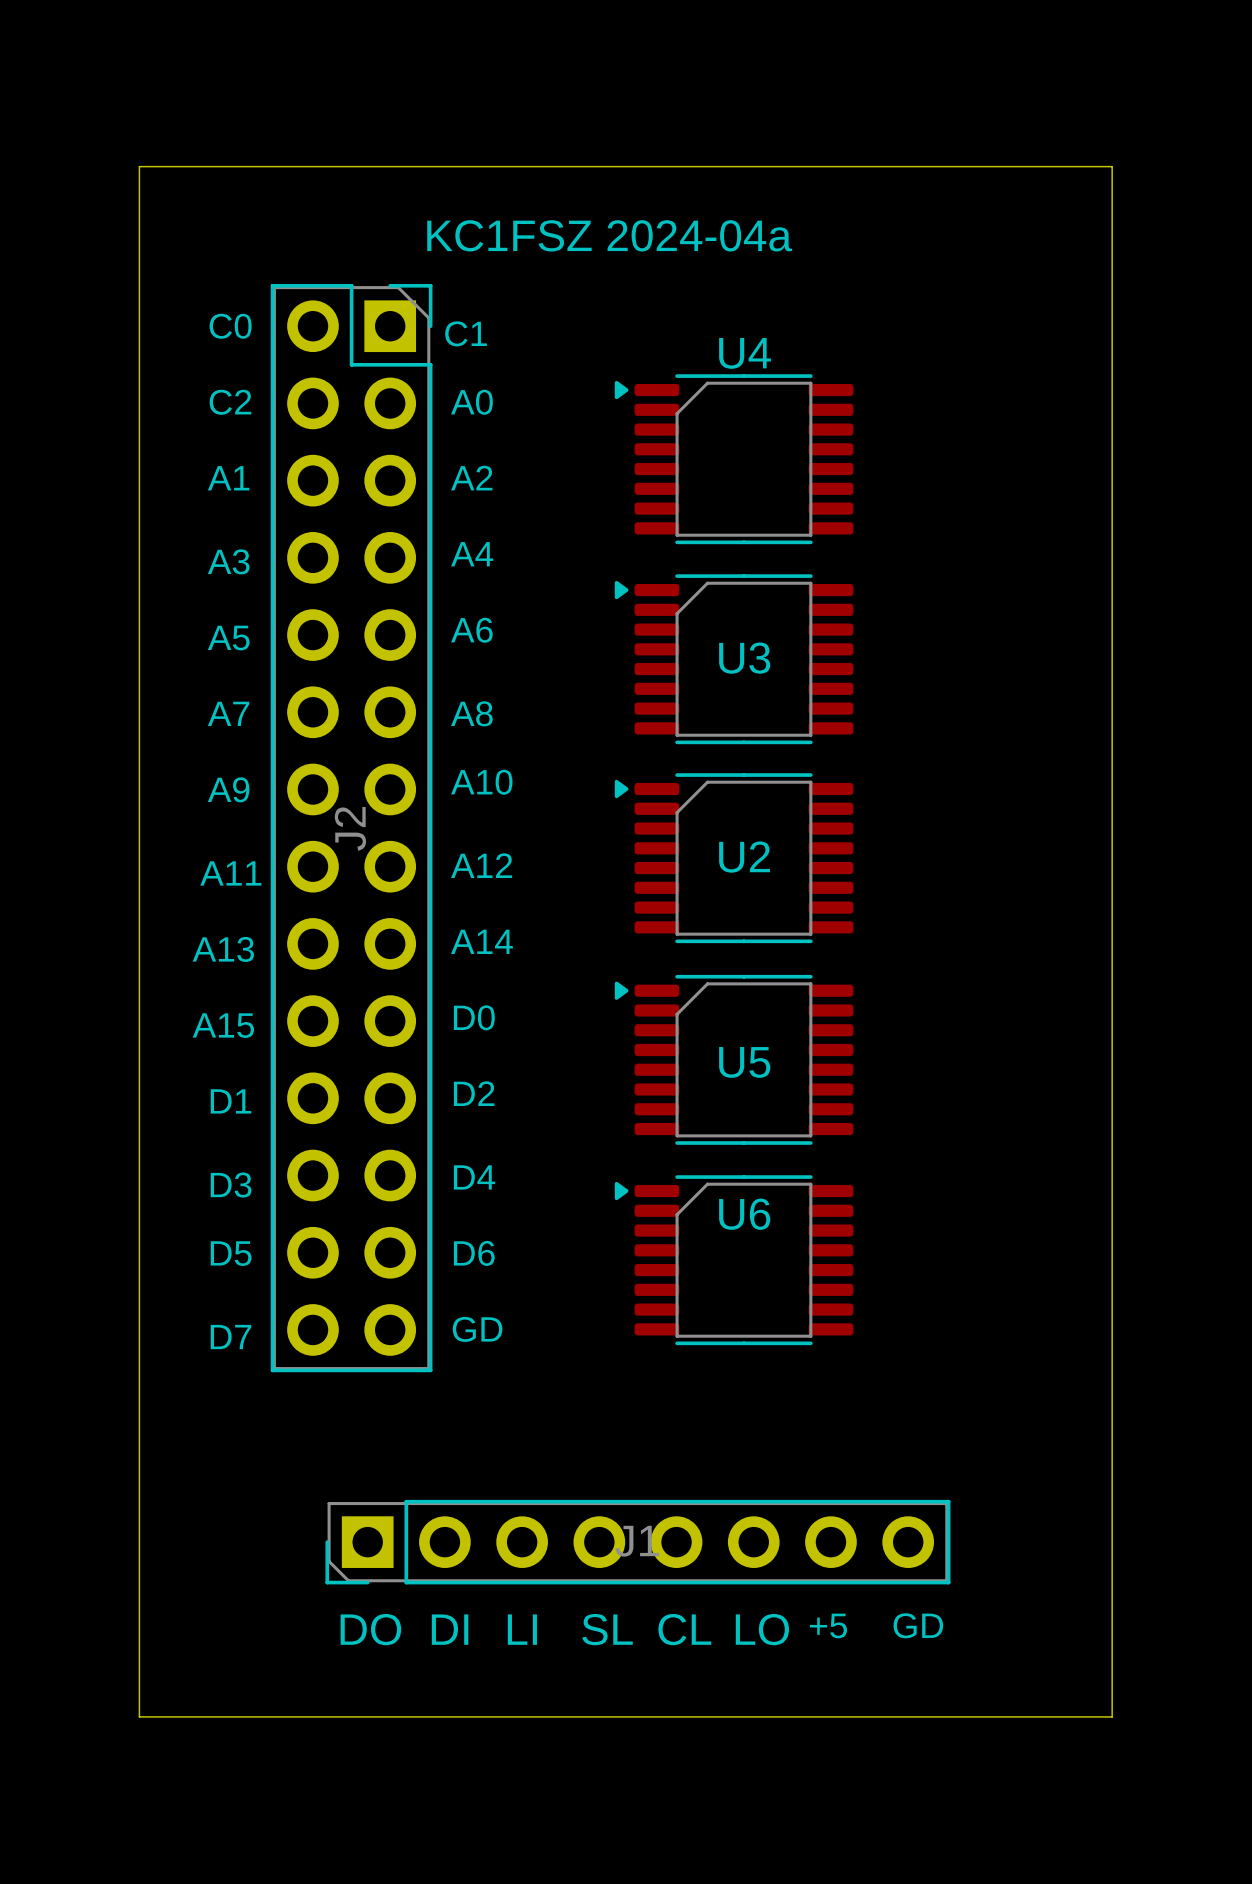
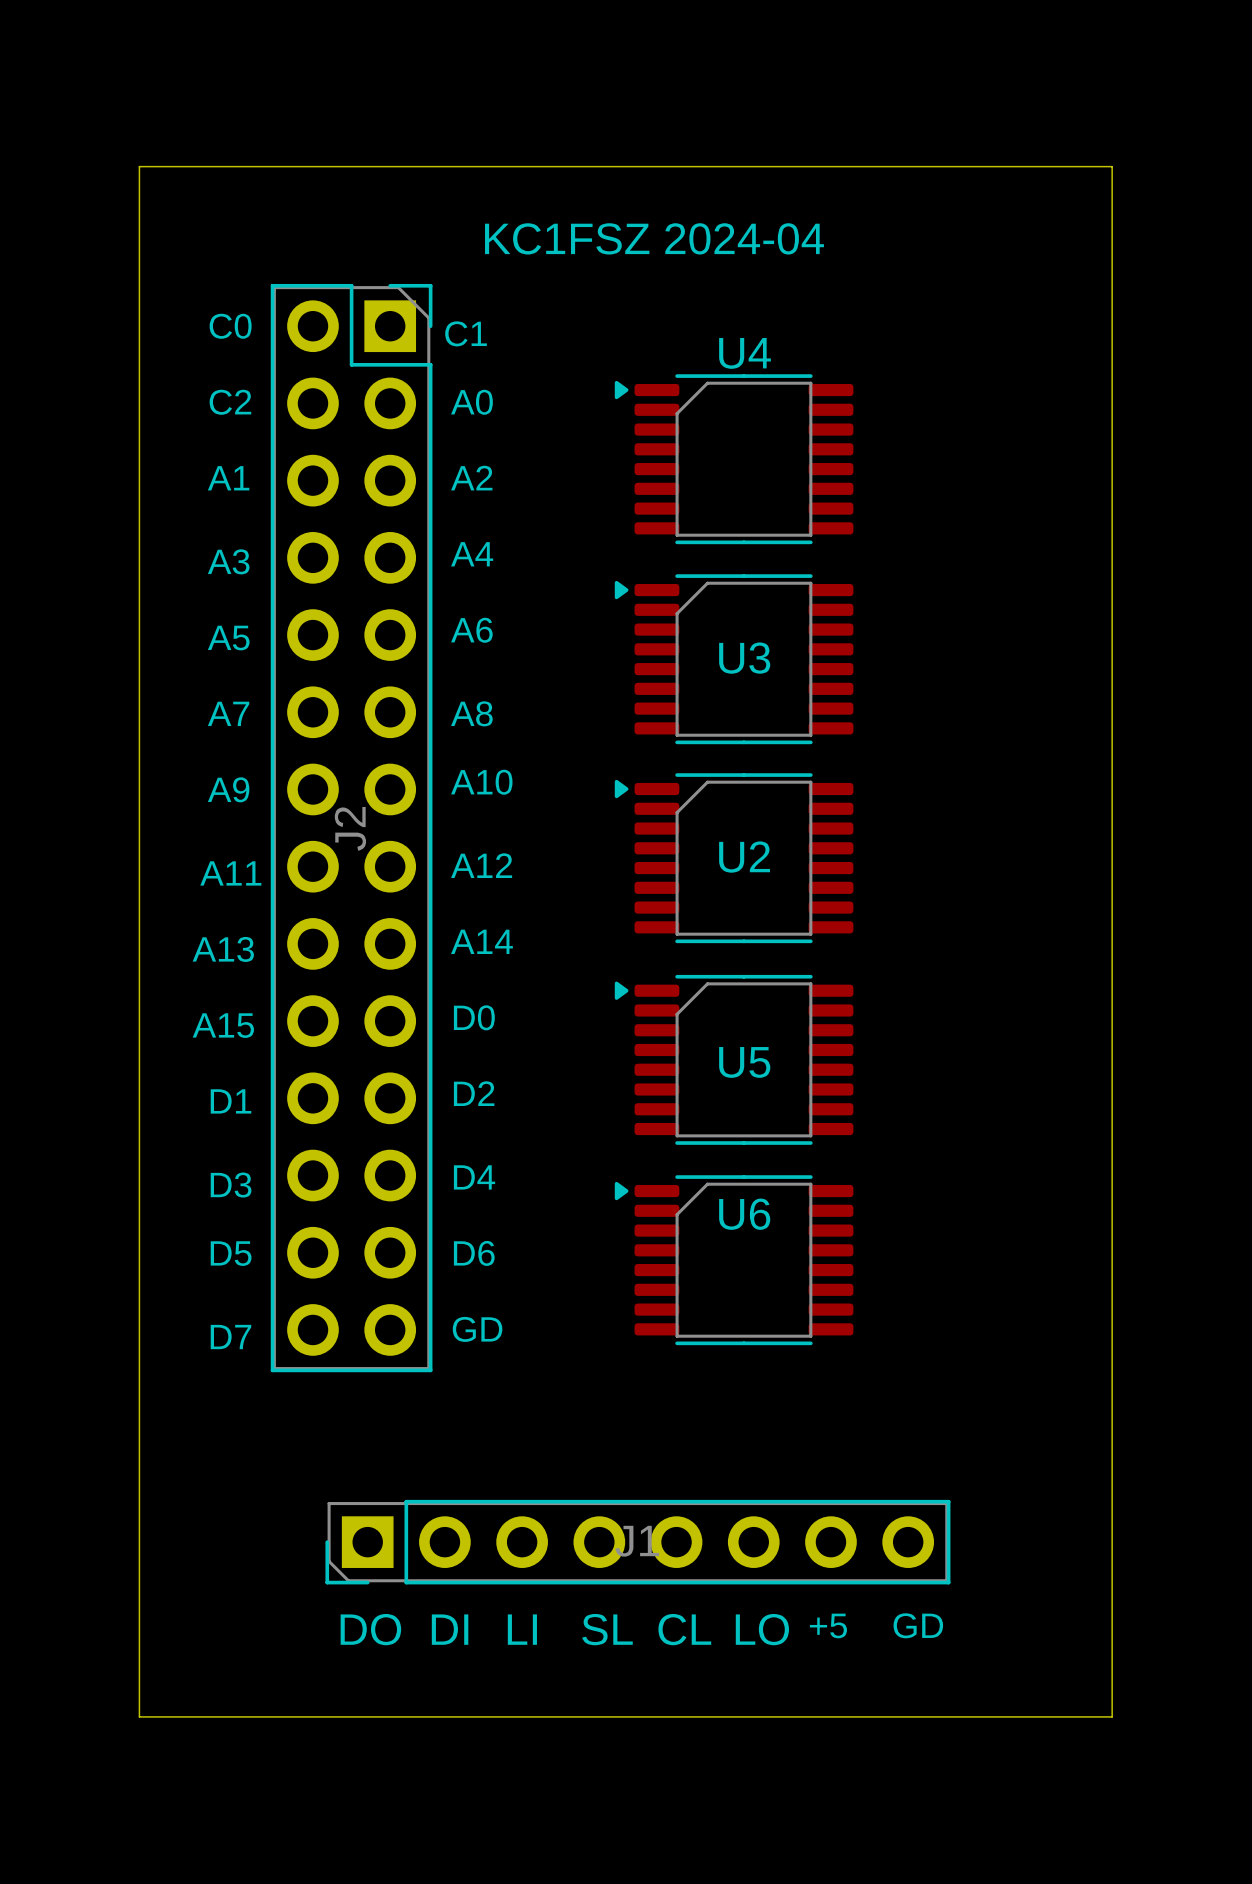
text: KC1FSZ 2024-04a (609, 235) -> KC1FSZ 2024-04 (654, 238)

